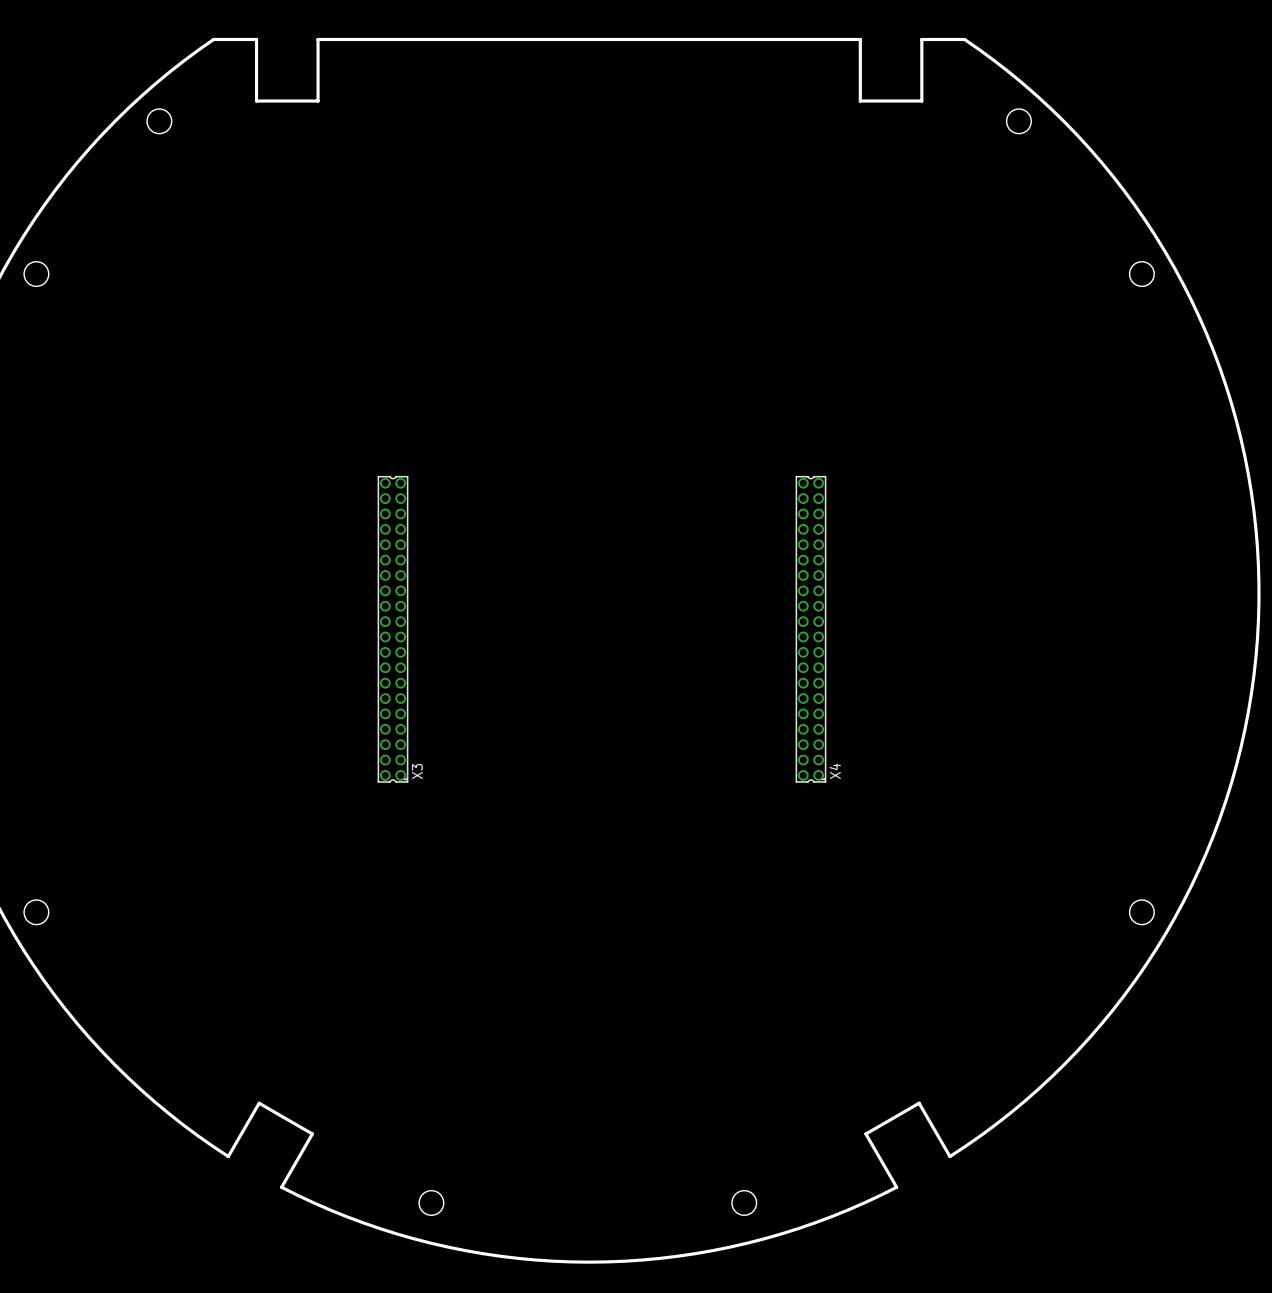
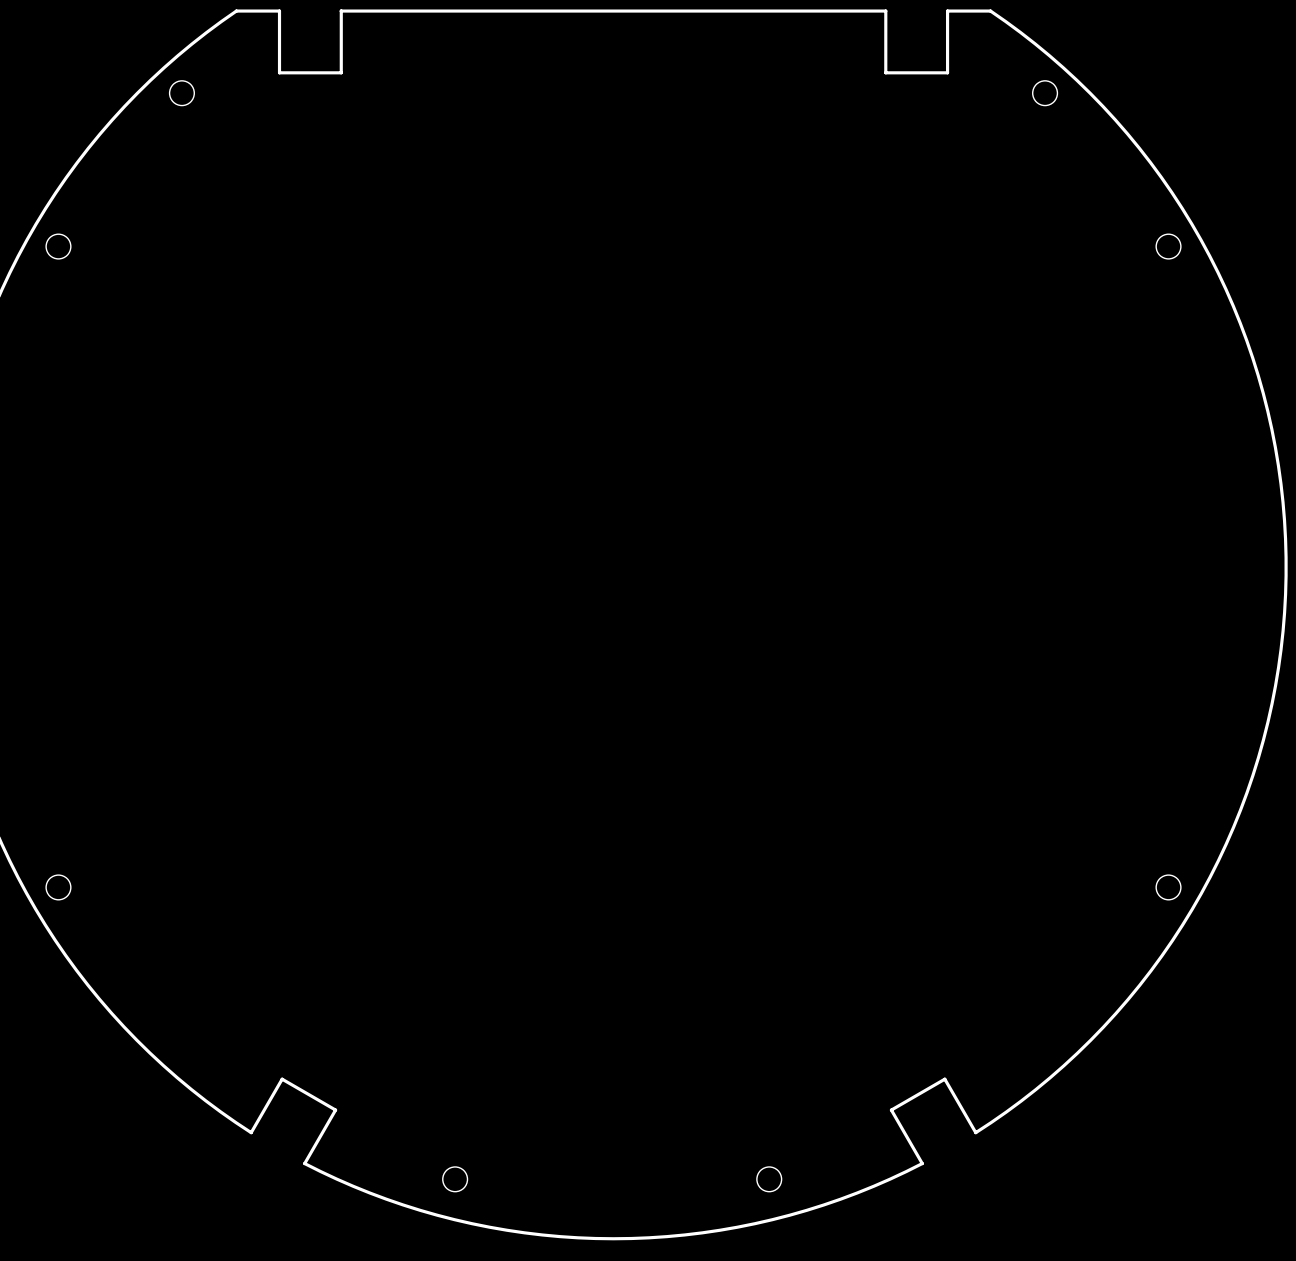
X3: (392, 629) -> none
X4: (810, 629) -> none

